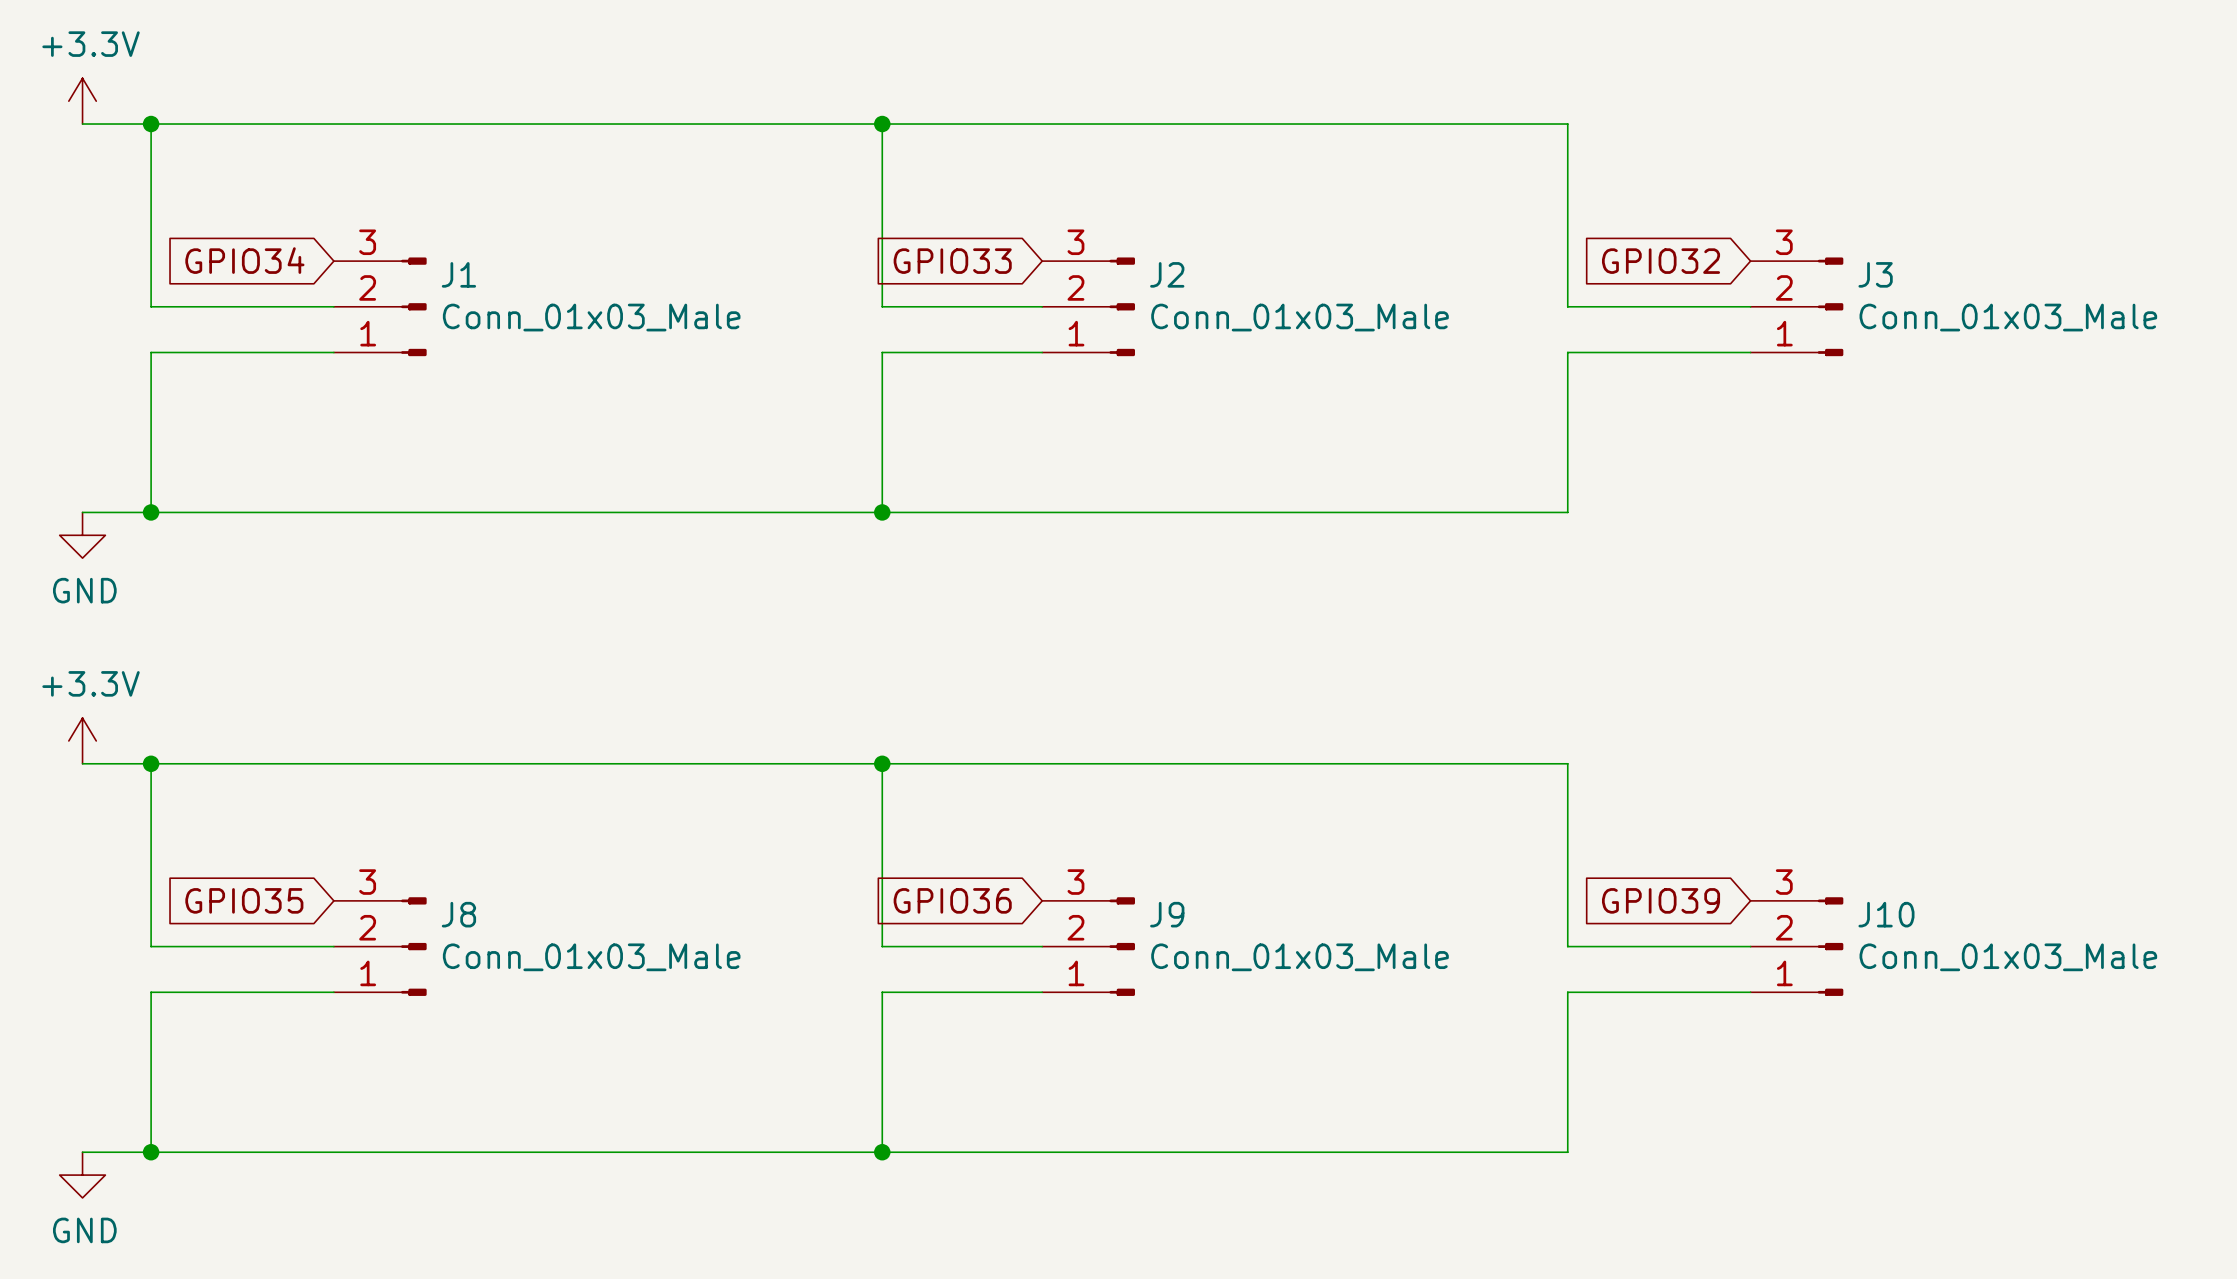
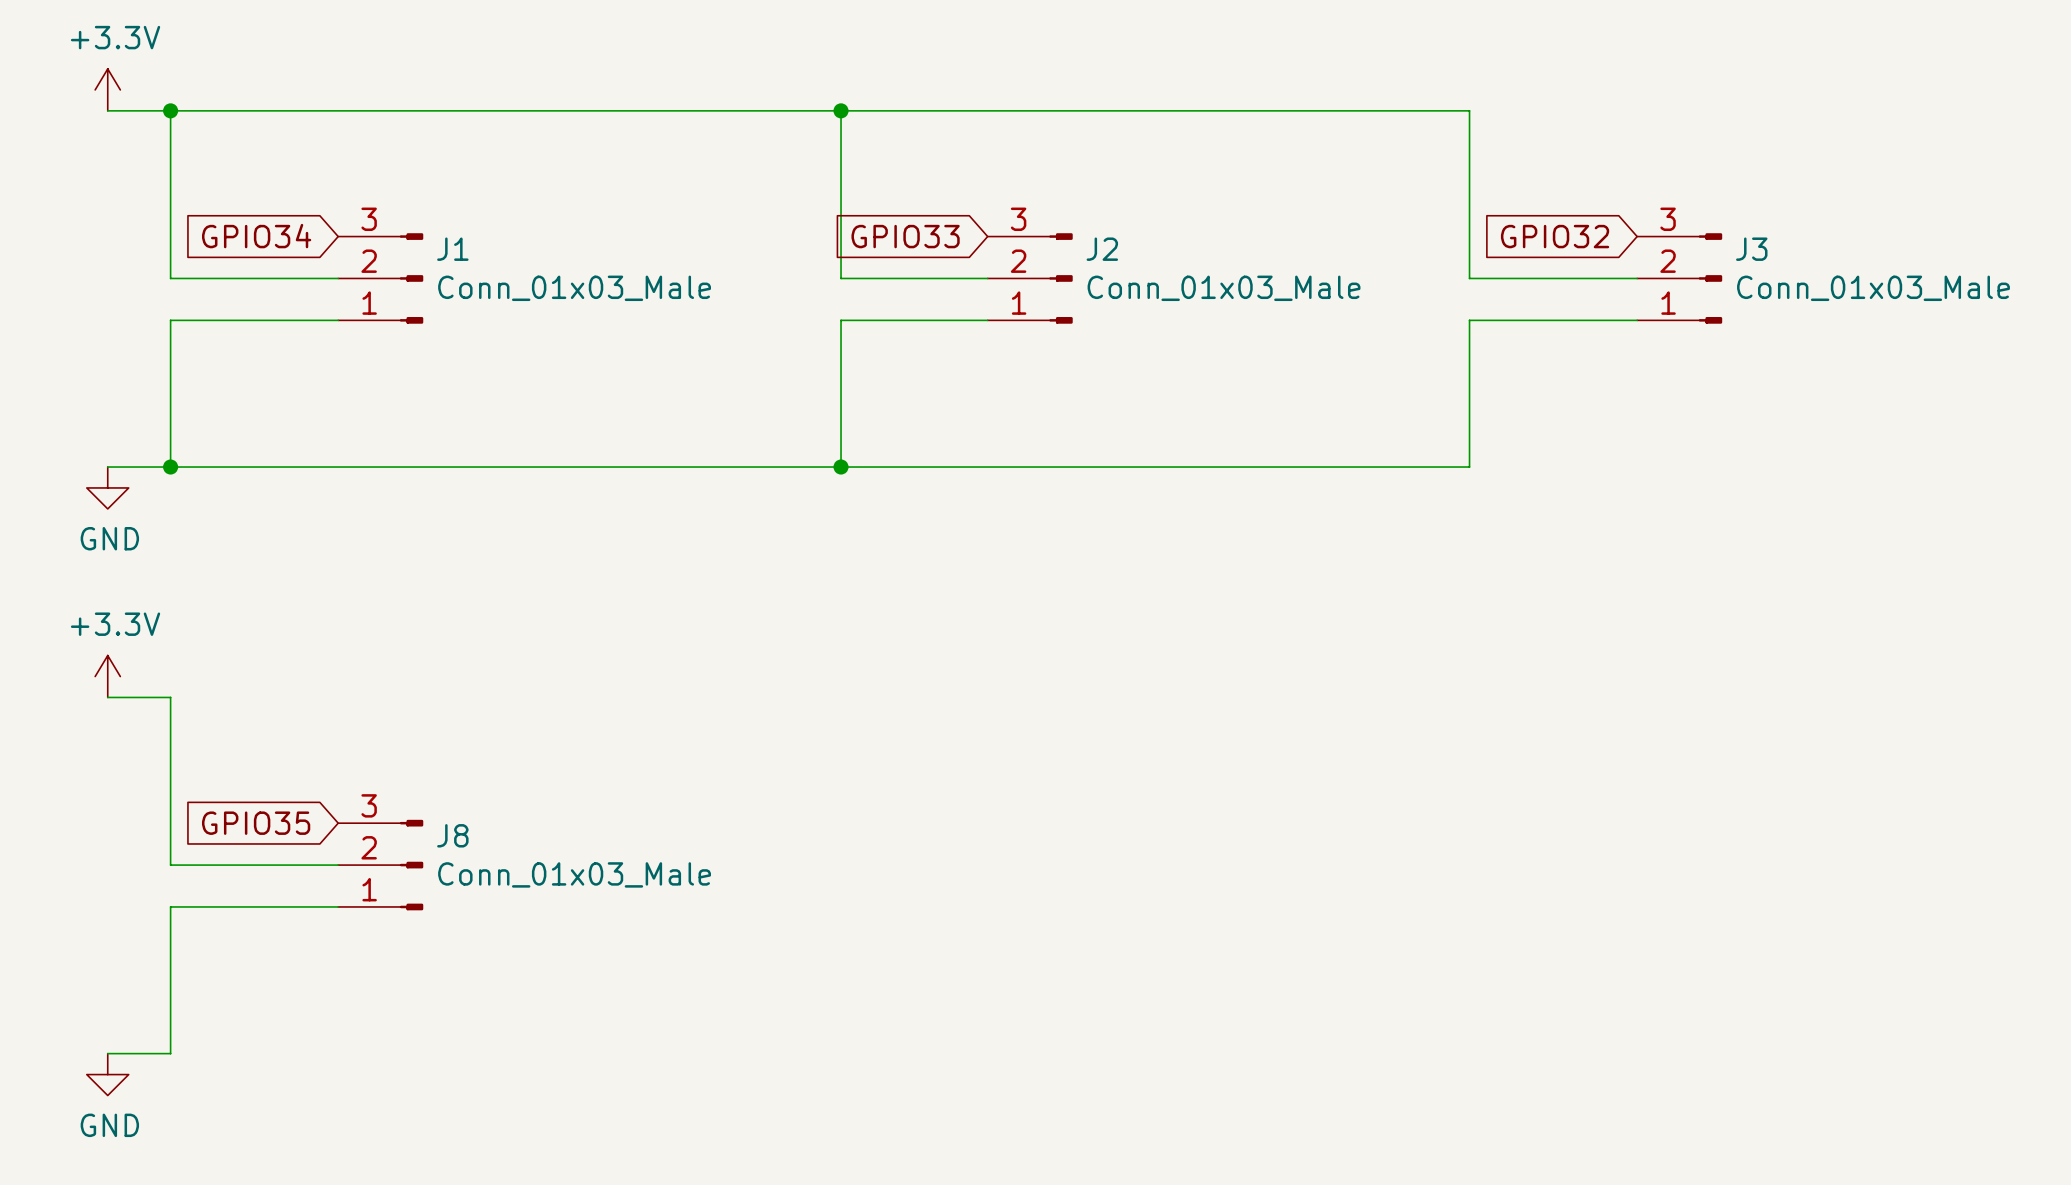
wire: (151, 763) (1567, 763) (1567, 946) (1750, 946) -> none
junction: (151, 763) -> none
wire: (882, 763) (882, 946) (1042, 946) -> none
junction: (882, 763) -> none
global label: GPIO36 (952, 900) -> none
global label: GPIO39 (1661, 900) -> none
J9: Conn_01x03_Male (1088, 946) -> none
J10: Conn_01x03_Male (1796, 946) -> none
wire: (1042, 992) (882, 992) (882, 1152) -> none
wire: (1750, 992) (1567, 992) (1567, 1152) (151, 1152) -> none
junction: (151, 1152) -> none
junction: (882, 1152) -> none

